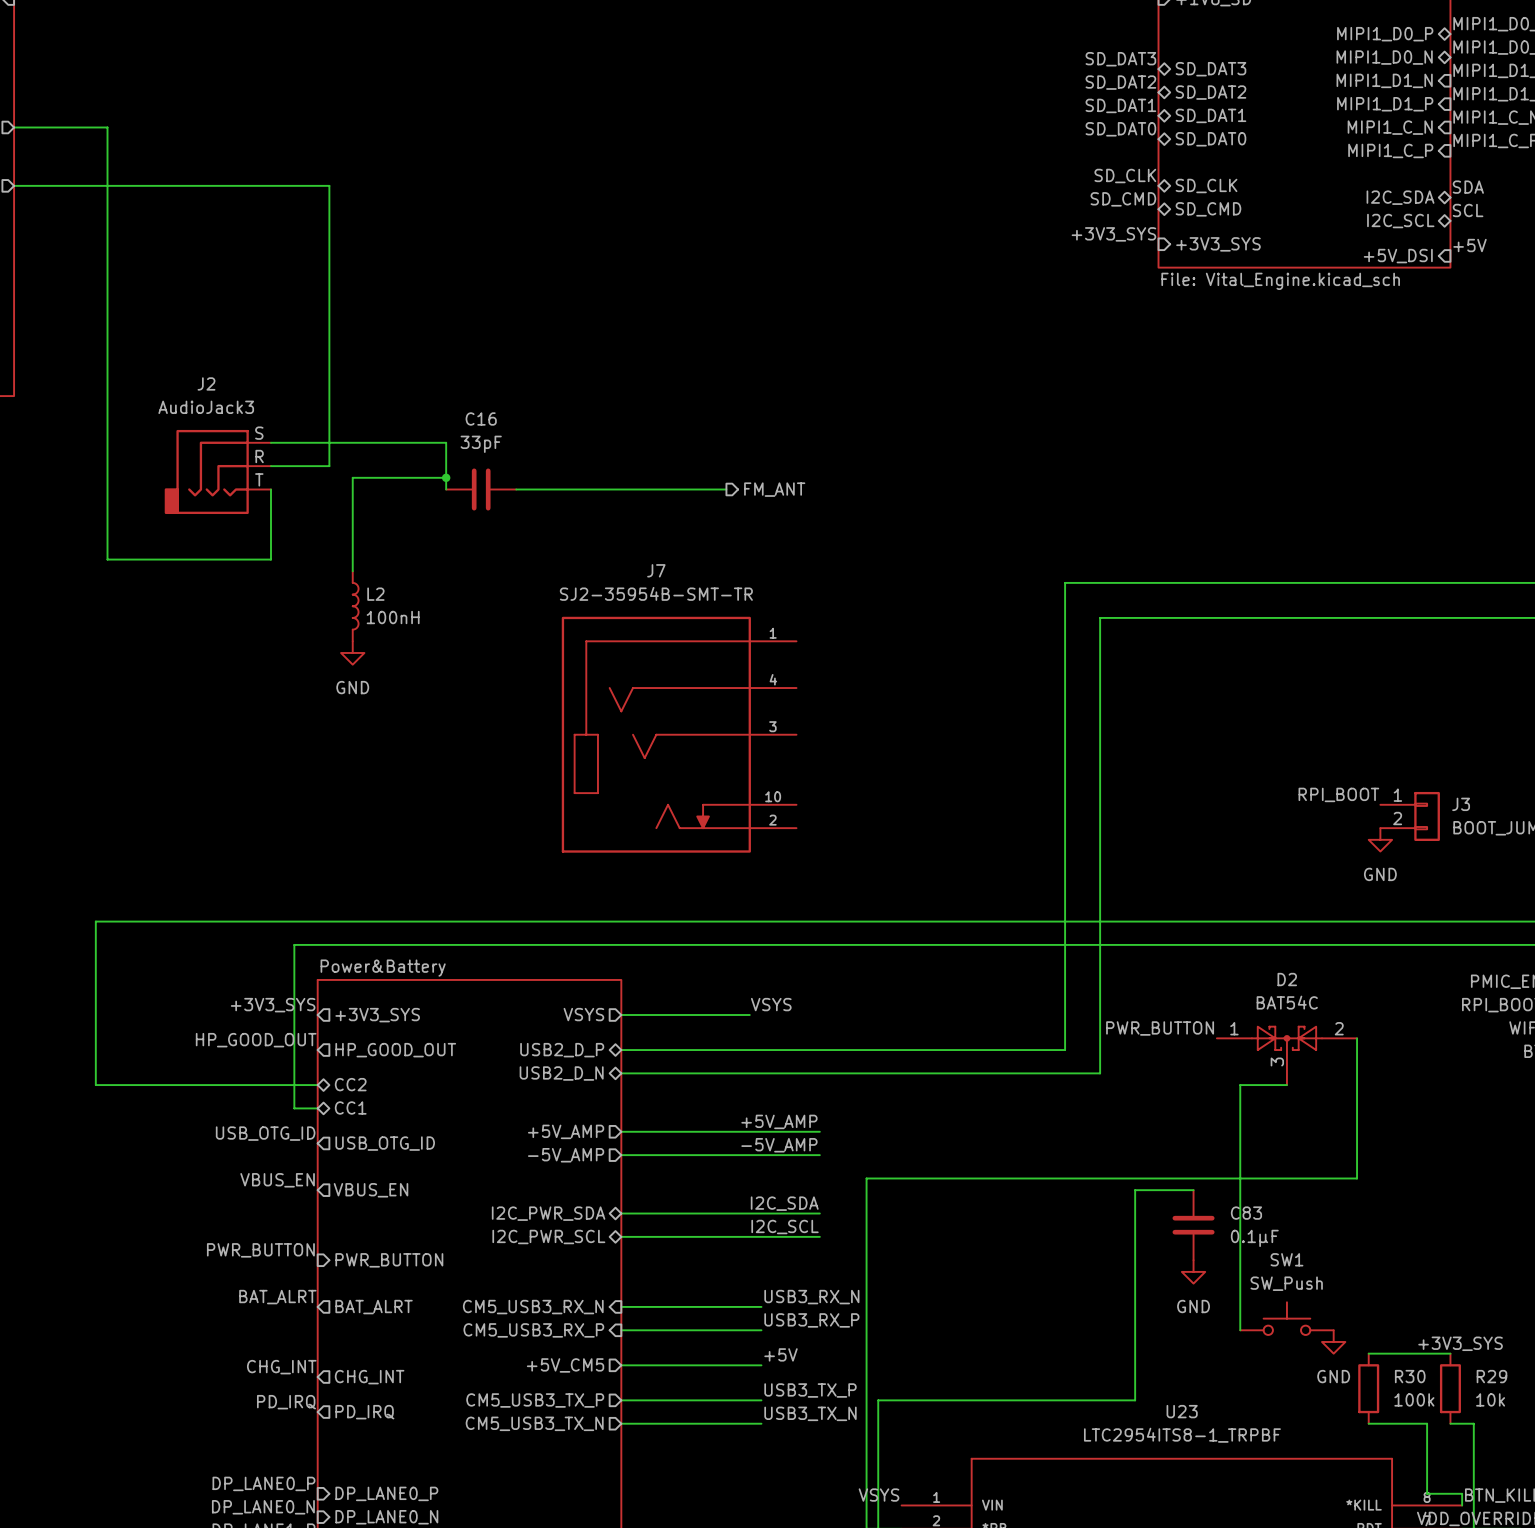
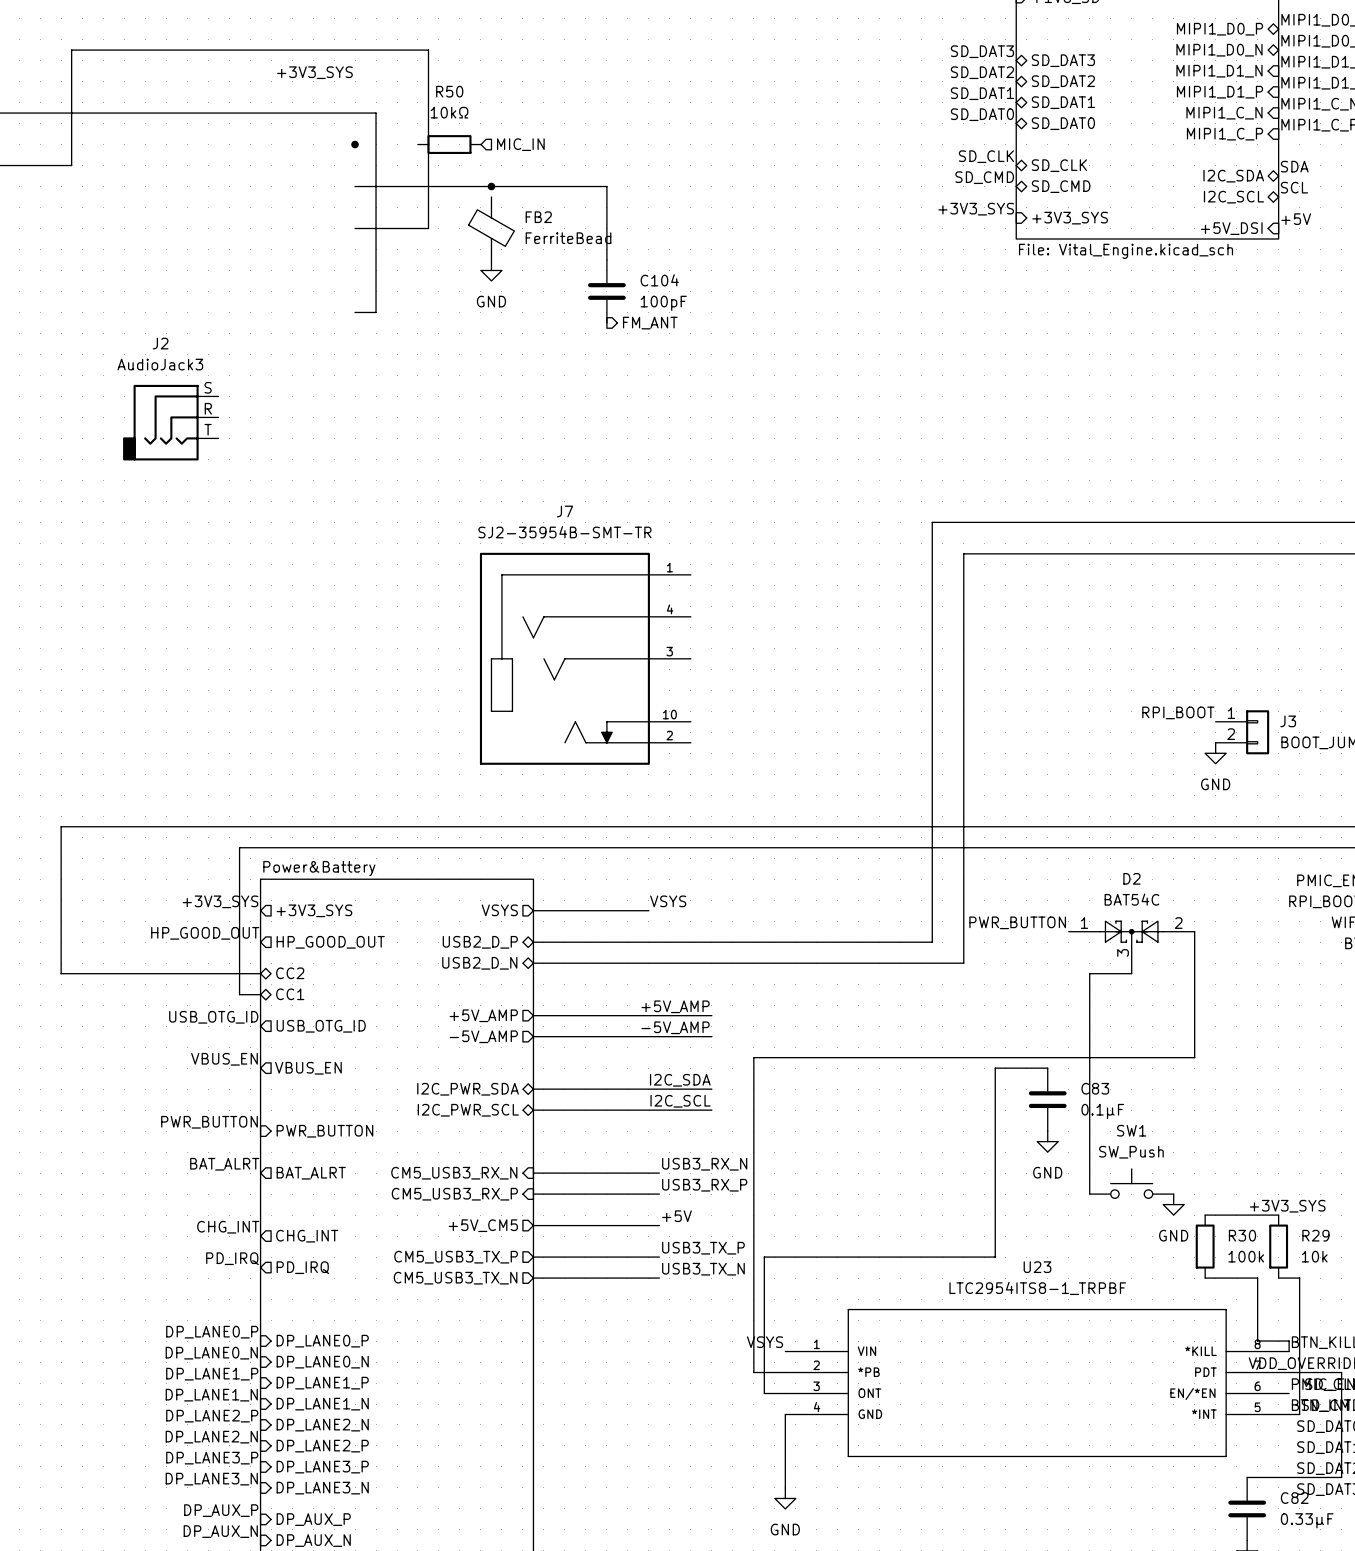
label: none -> +3V3_SYS (314, 72)
junction: none -> (355, 144)
R50: none -> 10kΩ (449, 144)
hierarchical label: none -> MIC_IN (520, 144)
wire: none -> (355, 186) (606, 186) (606, 259)
junction: none -> (491, 186)
wire: none -> (355, 228) (428, 228) (428, 50) (71, 50) (71, 113) (376, 113) (376, 312) (355, 312)
FB2: none -> FerriteBead (491, 228)
power symbol: none -> GND (491, 270)
C104: none -> 100pF (606, 291)
wire: (270, 442) (446, 442) (446, 489) -> none
wire: (270, 466) (329, 466) (329, 185) (107, 185) (107, 559) (270, 559) (270, 489) -> none
wire: (446, 477) (352, 477) (352, 571) -> none
junction: (446, 477) -> none
C16: 33pF (481, 489) -> none
wire: (516, 489) (726, 489) -> none
hierarchical label position: FM_ANT (774, 489) -> FM_ANT (650, 323)
L2: 100nH (355, 606) -> none
power symbol: GND (352, 652) -> none

